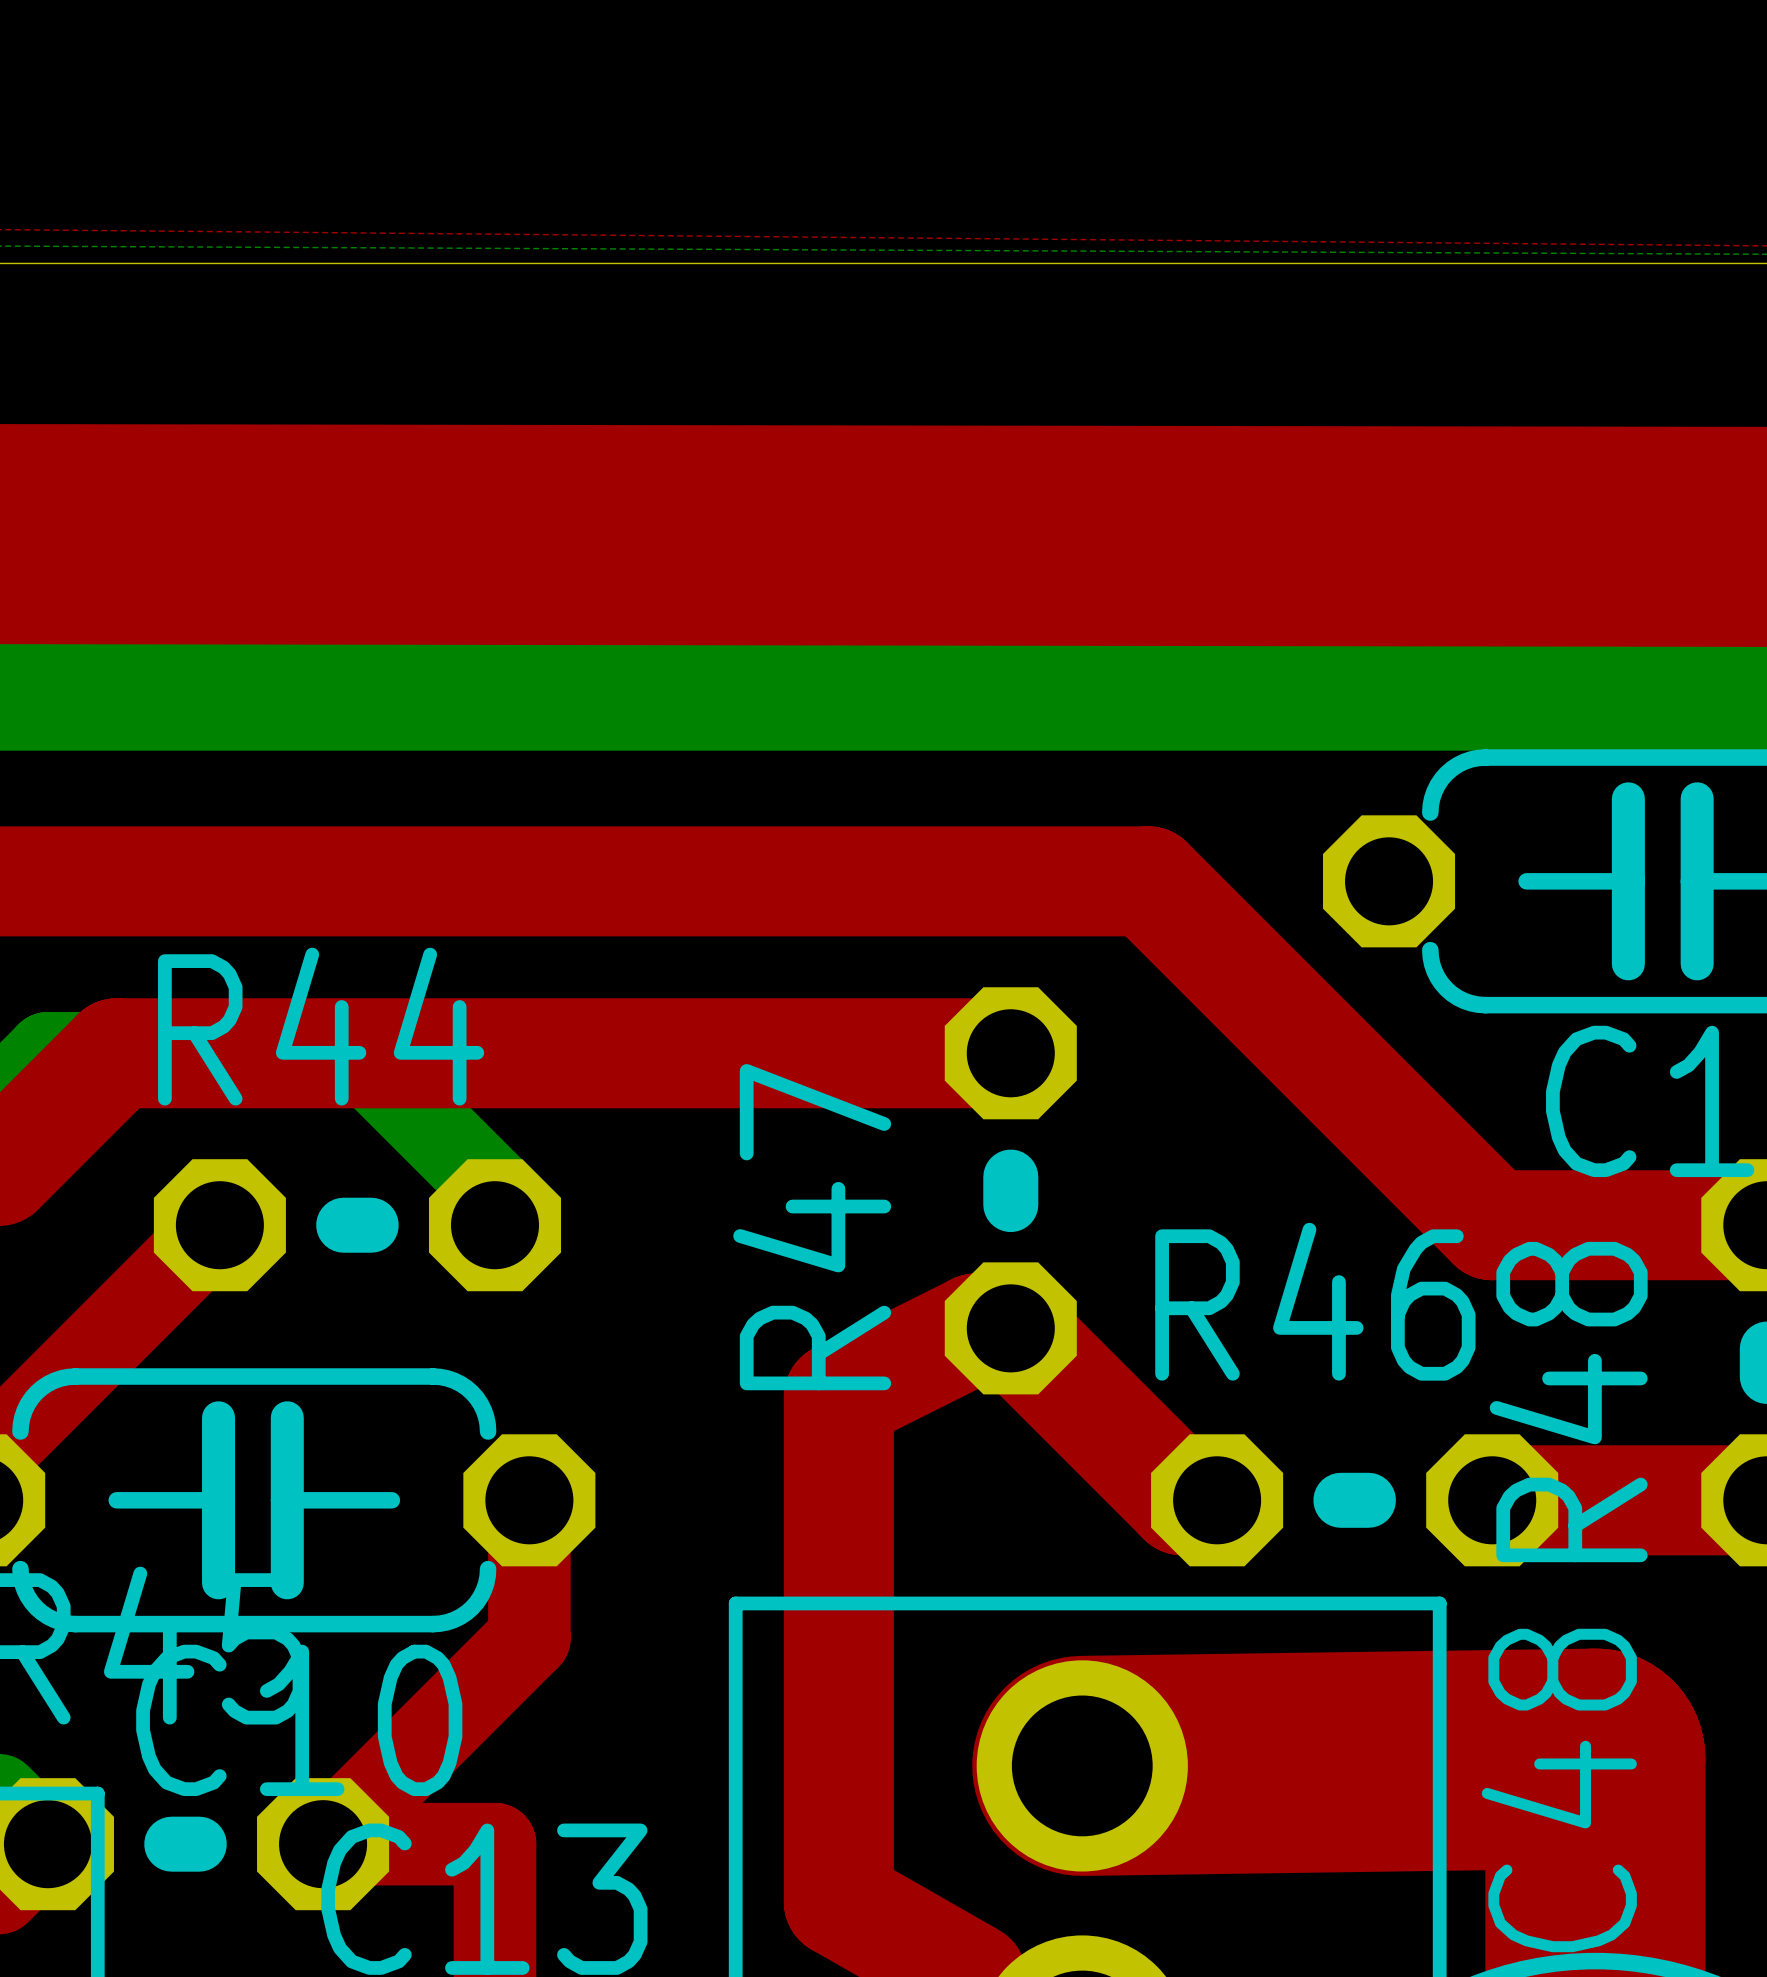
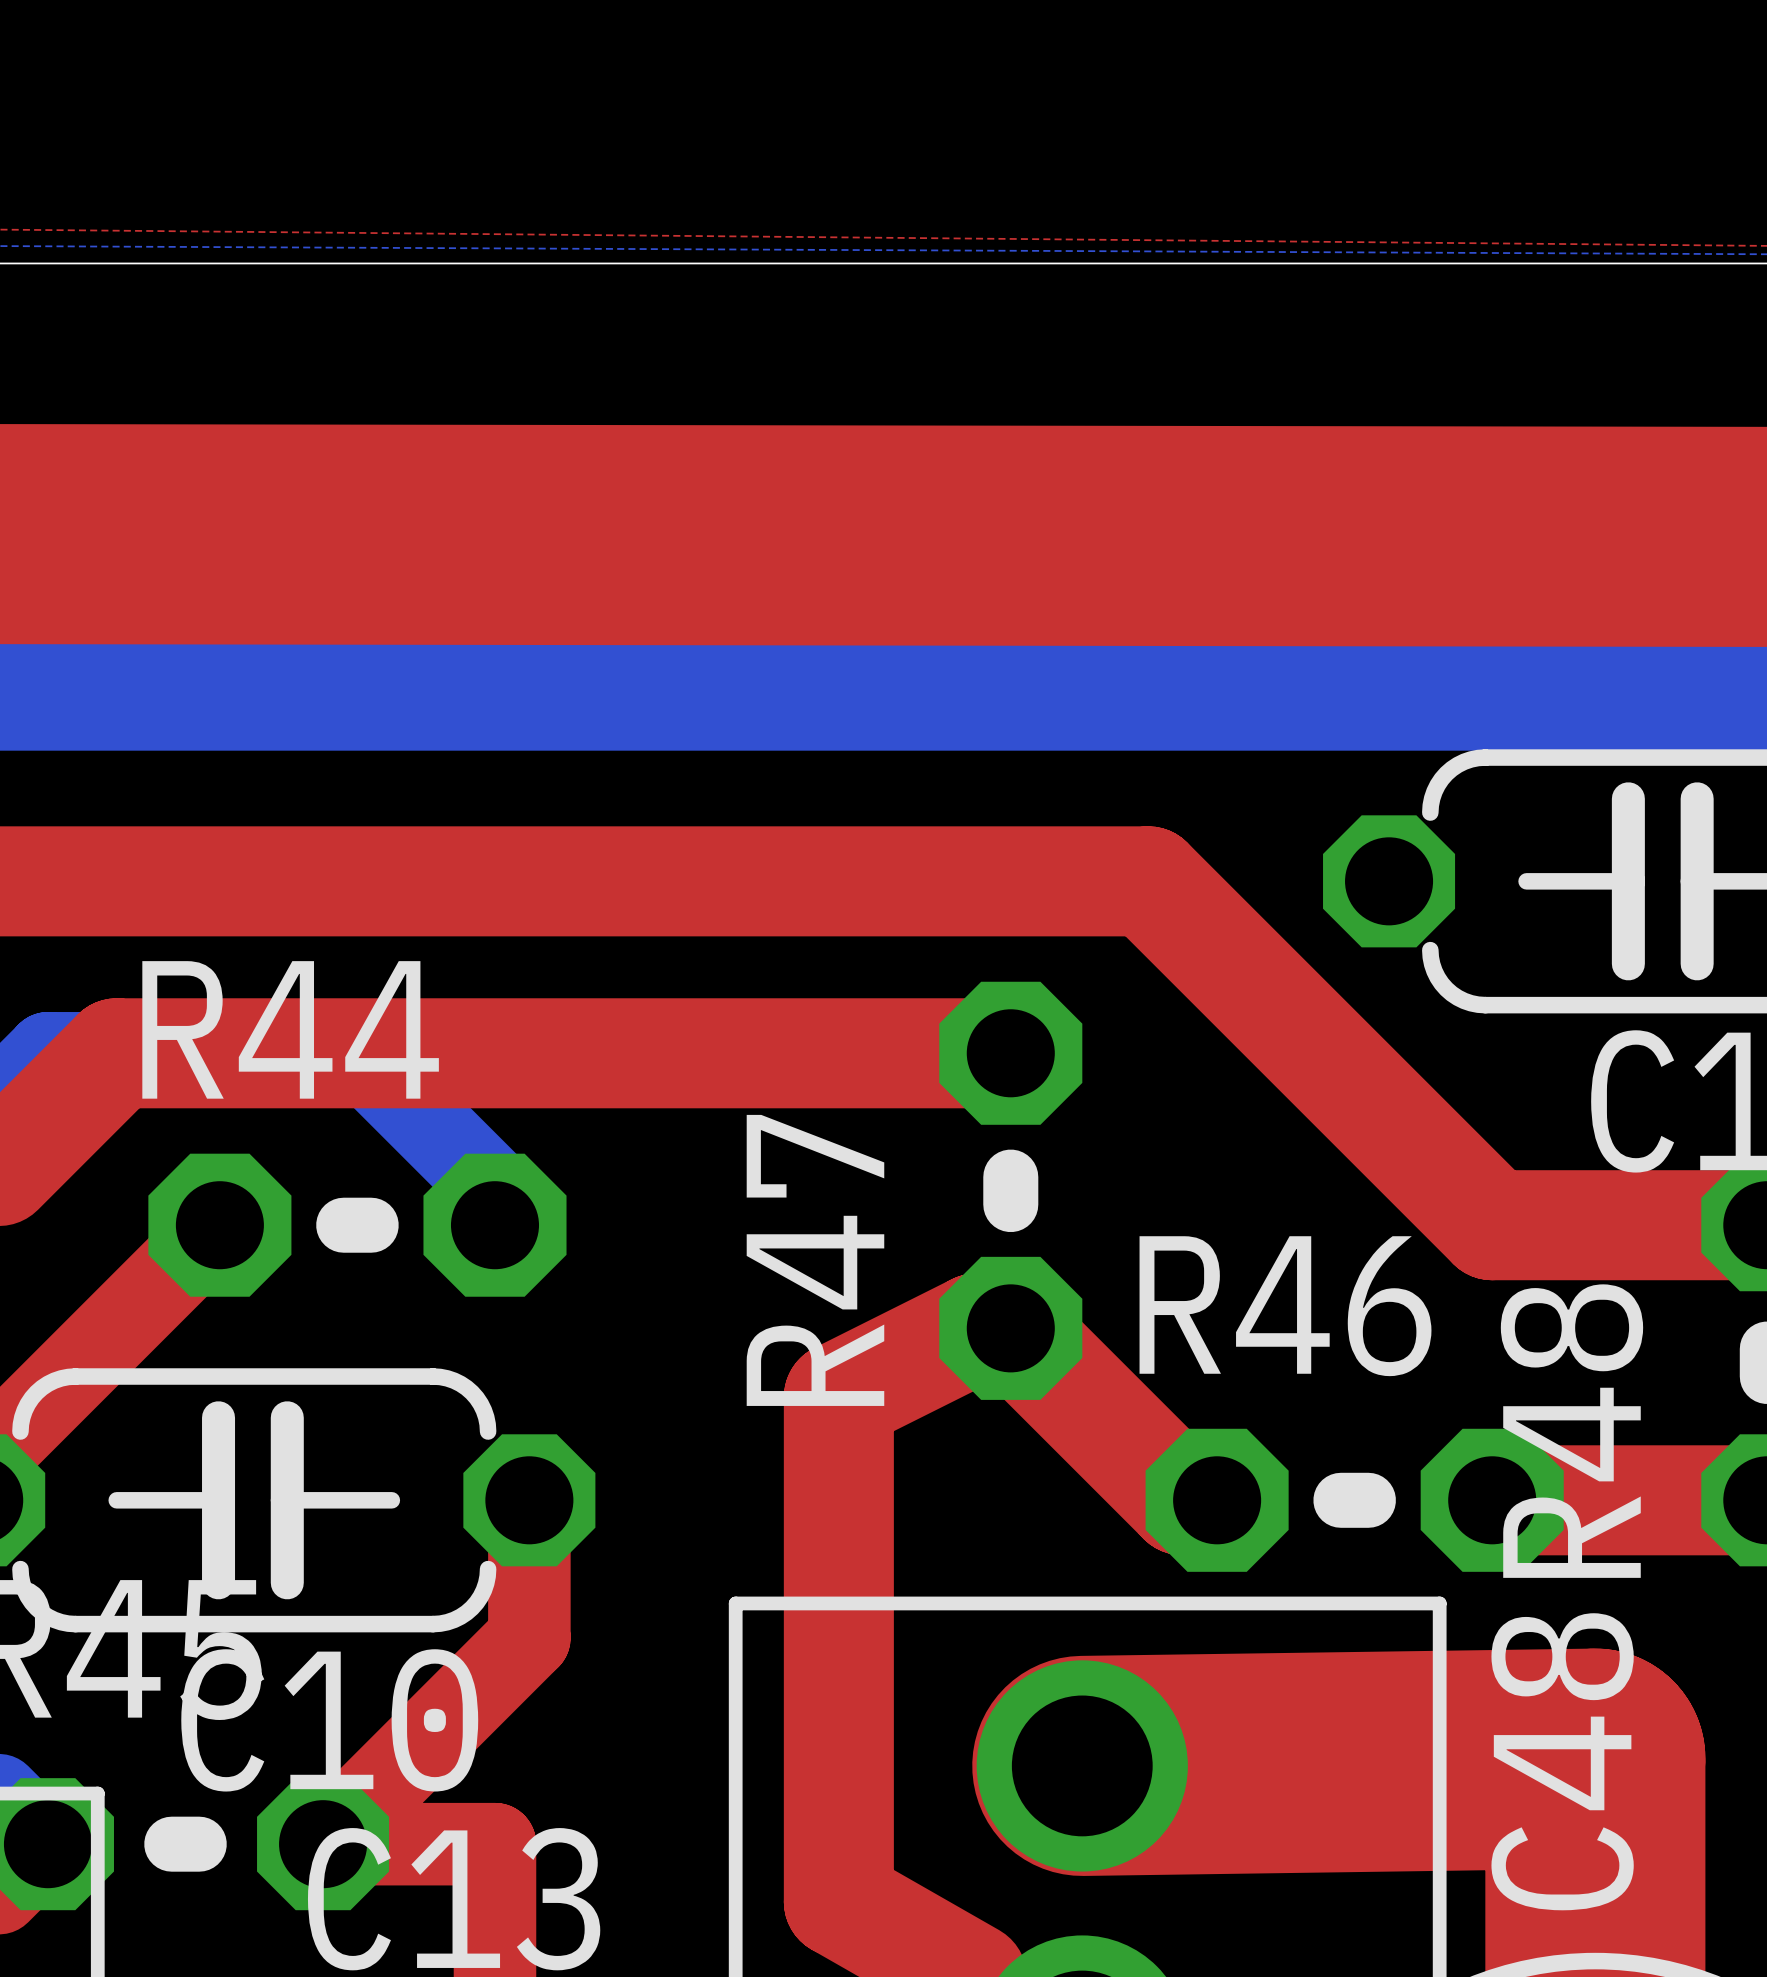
R47 footprint: [944, 987, 1077, 1395] -> [939, 981, 1083, 1400]
R44 footprint: [153, 1159, 562, 1292] -> [148, 1153, 567, 1297]
R46 footprint: [1151, 1434, 1559, 1567] -> [1145, 1428, 1564, 1572]

